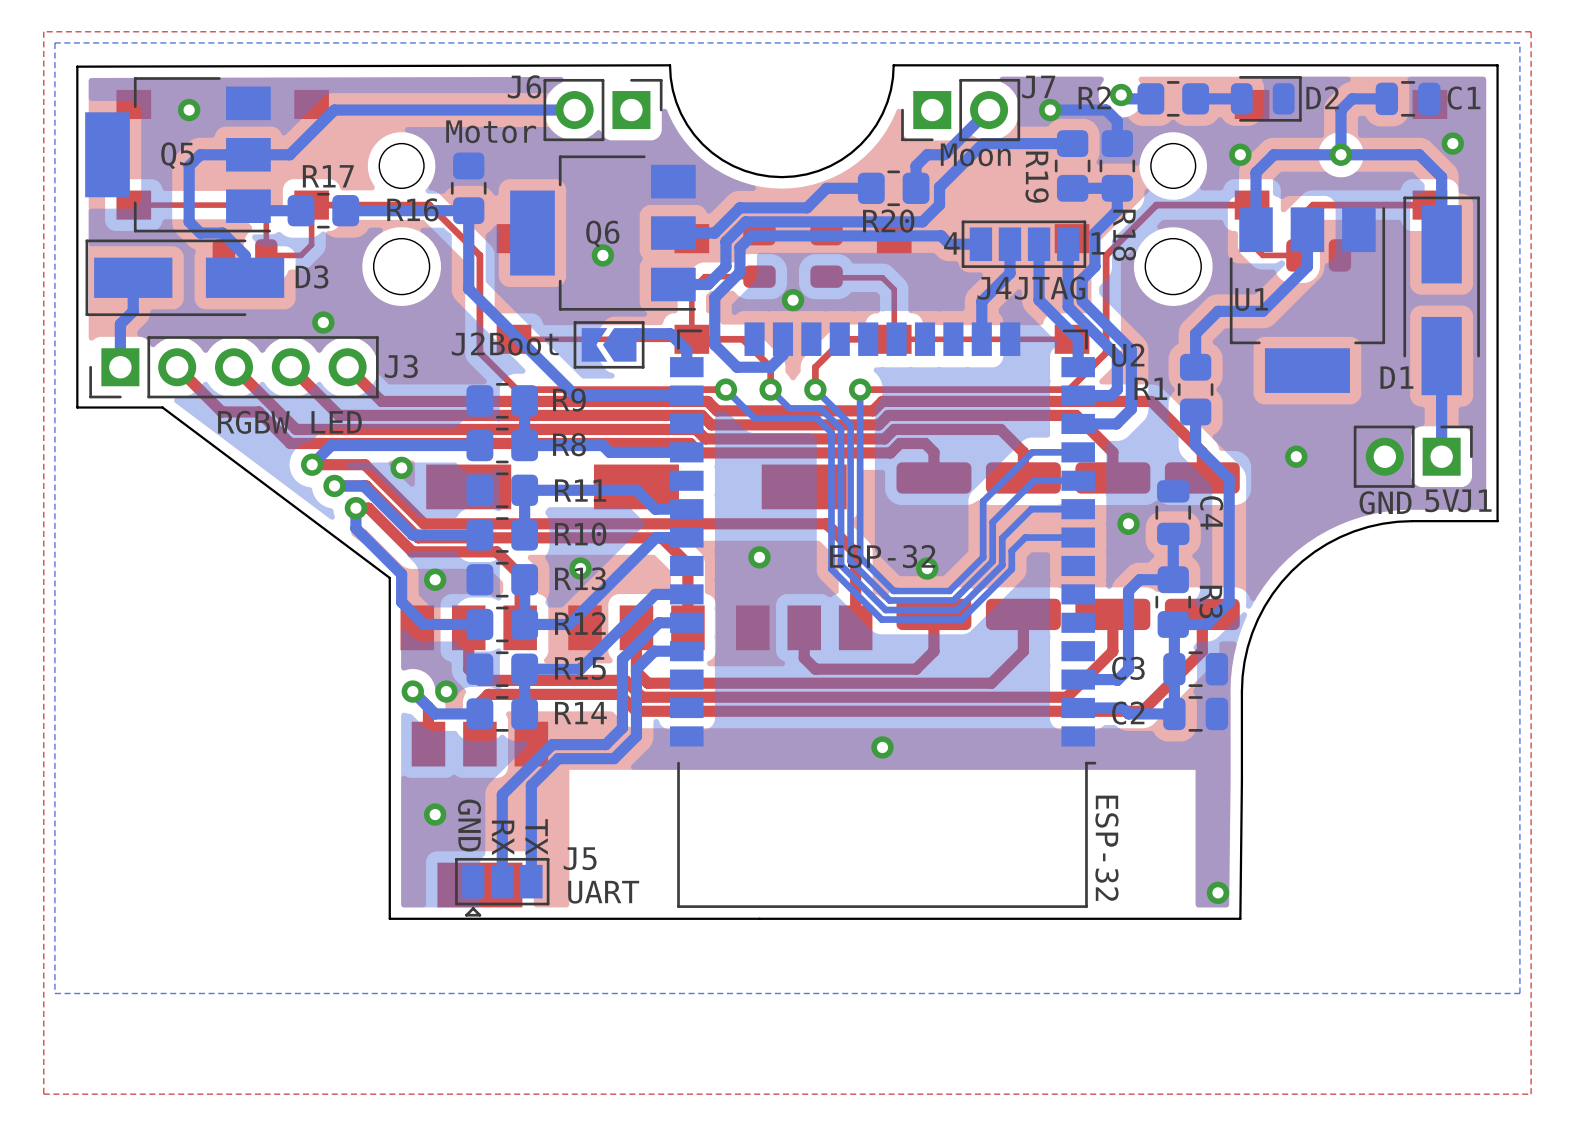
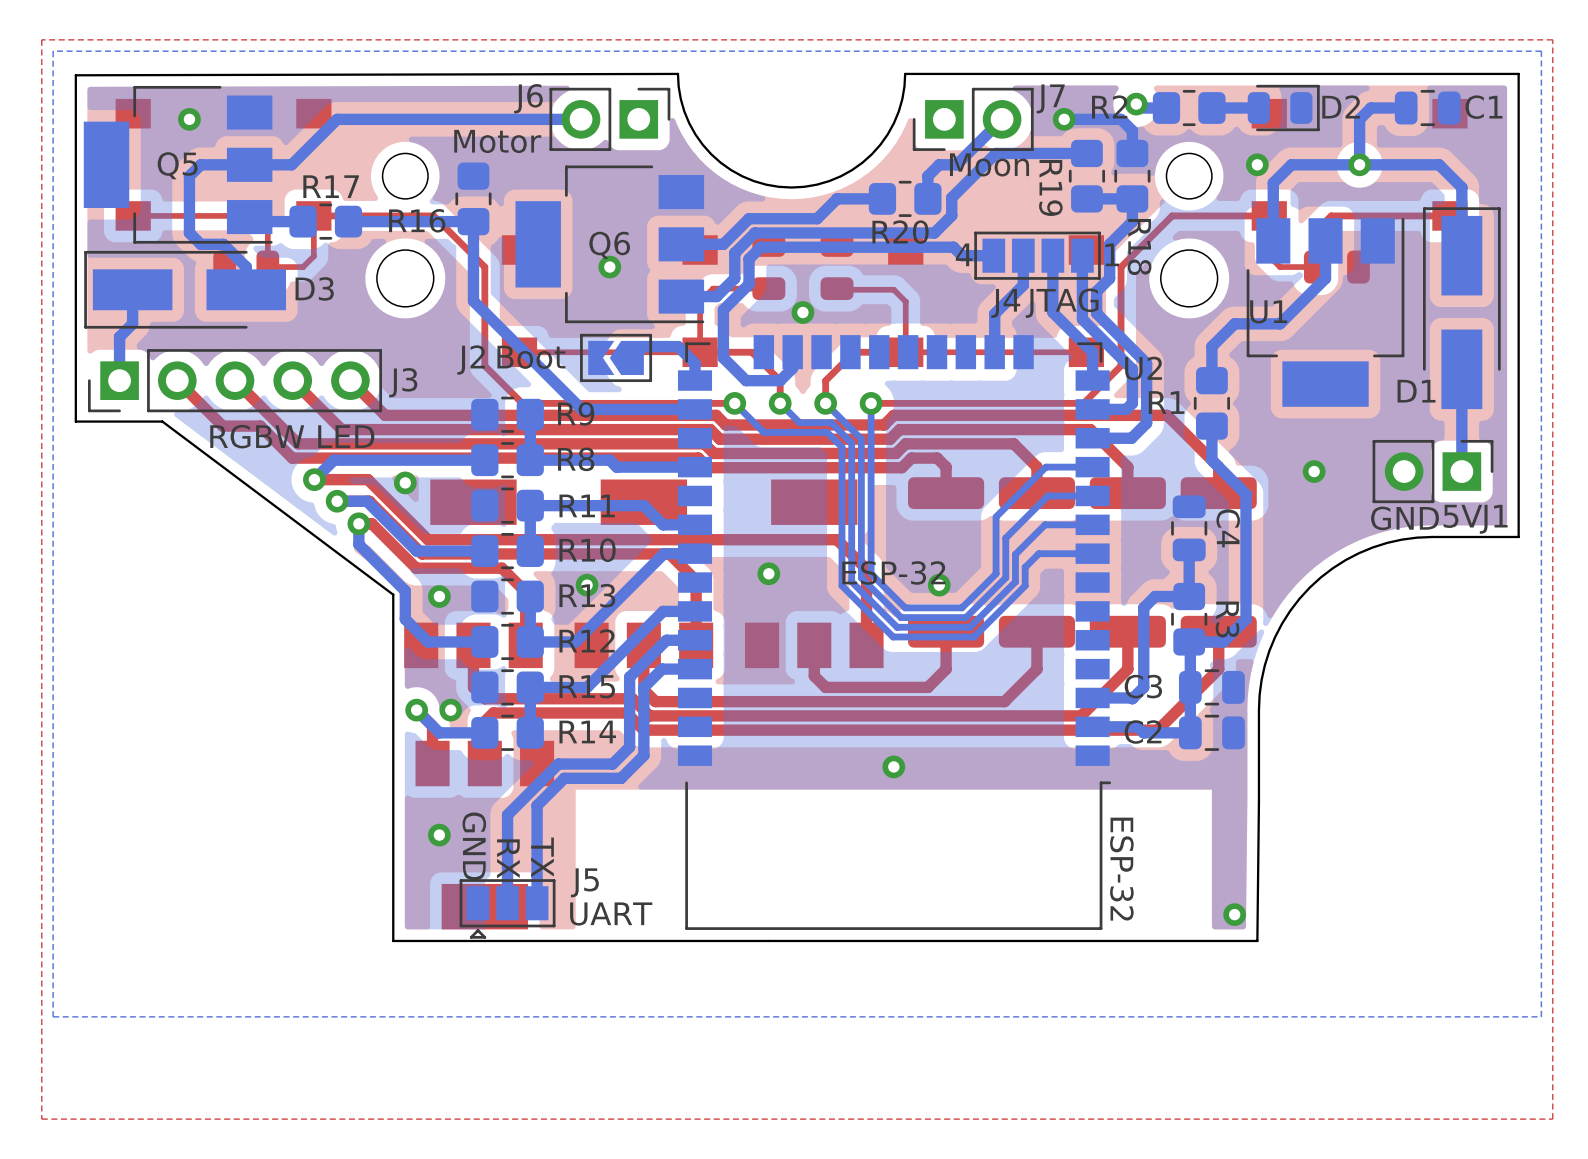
via: (1452, 143) -> none
via: (323, 322) -> none
via: (1128, 523) -> none

